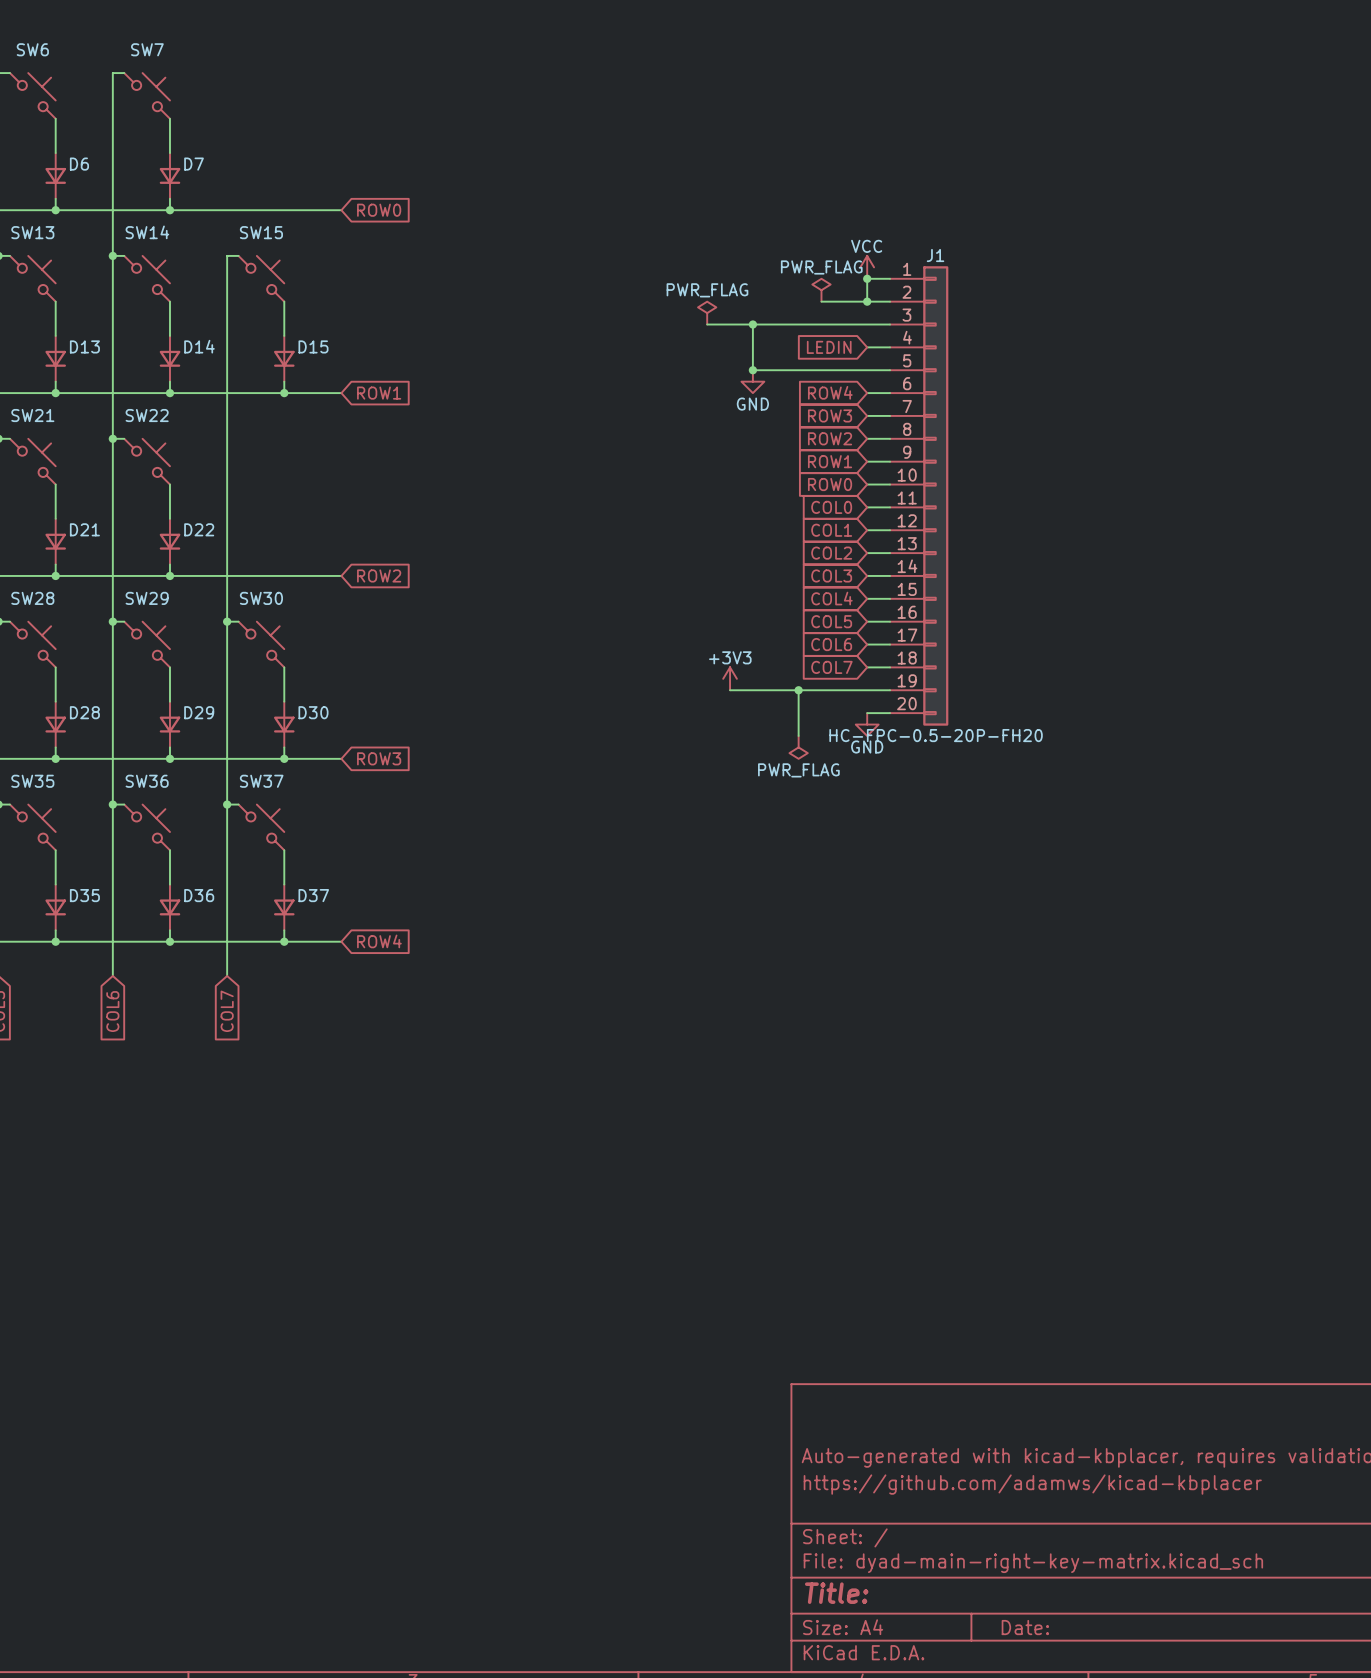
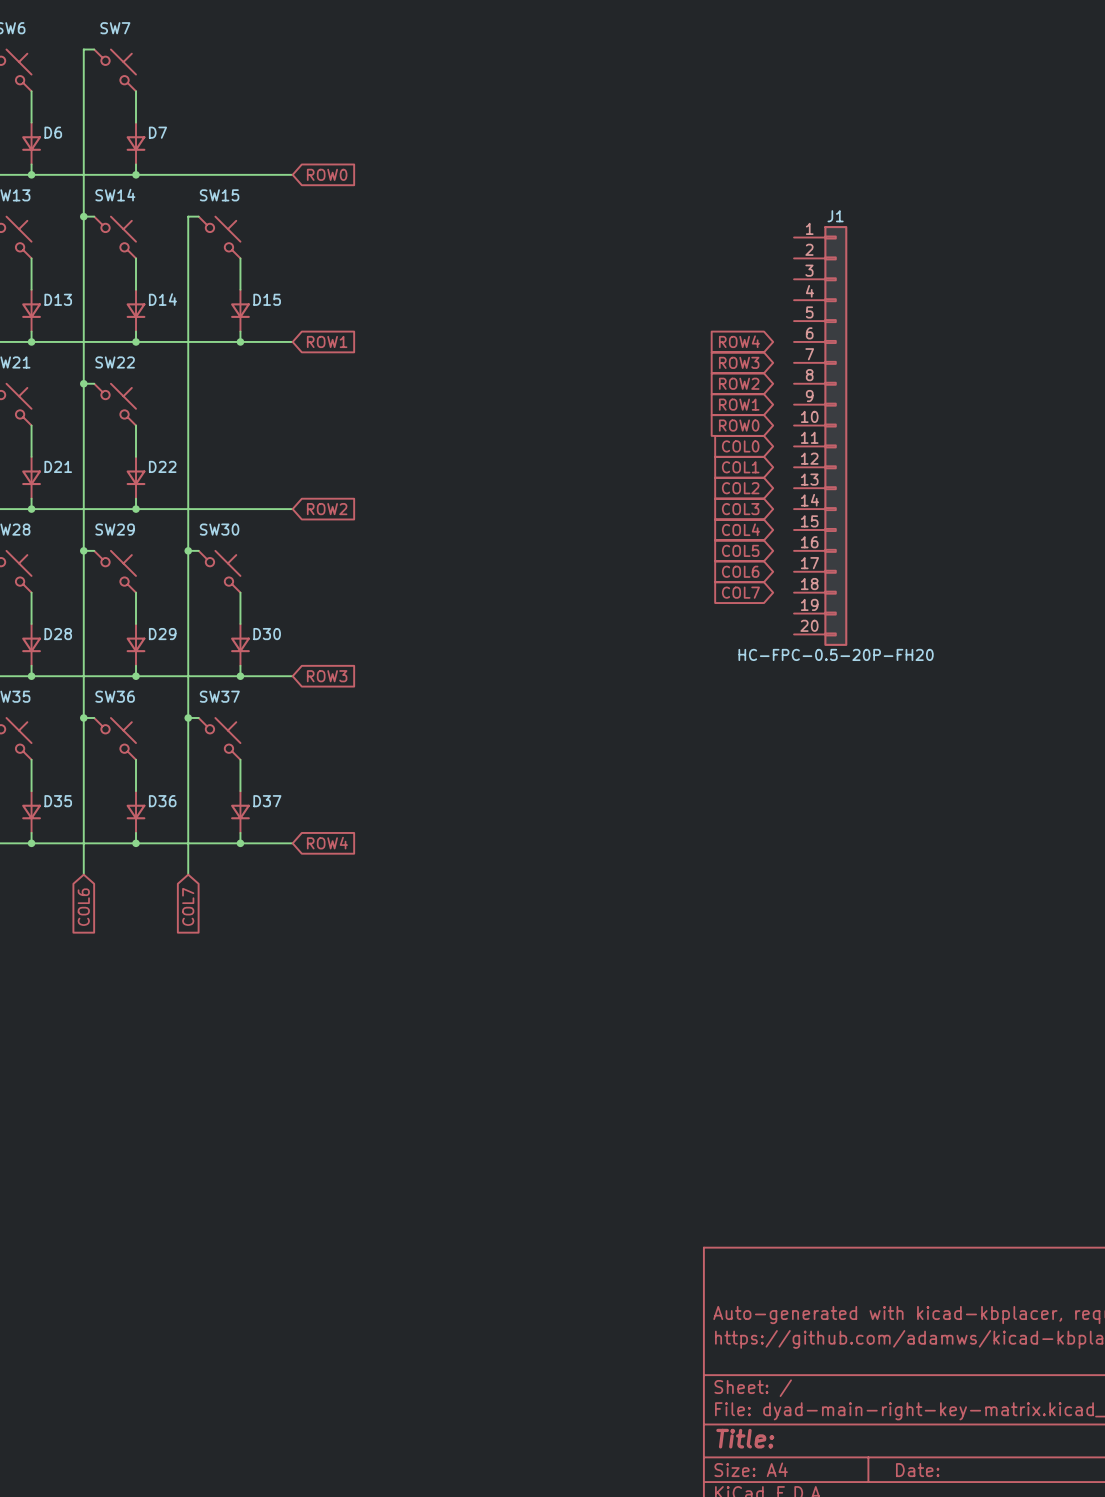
power symbol: VCC (867, 267) -> none
junction: (867, 278) -> none
wire: (890, 278) (867, 278) (867, 301) -> none
power symbol: PWR_FLAG (821, 290) -> none
wire: (821, 301) (890, 301) -> none
junction: (867, 301) -> none
power symbol: PWR_FLAG (707, 313) -> none
wire: (707, 324) (890, 324) -> none
wire: (752, 324) (752, 370) (890, 370) -> none
junction: (752, 324) -> none
global label: LEDIN (829, 347) -> none
wire: (867, 347) (890, 347) -> none
junction: (752, 370) -> none
power symbol: GND (752, 381) -> none
wire: (867, 393) (890, 393) -> none
wire: (867, 415) (890, 415) -> none
wire: (867, 438) (890, 438) -> none
wire: (867, 461) (890, 461) -> none
wire: (867, 484) (890, 484) -> none
wire: (867, 507) (890, 507) -> none
wire: (867, 530) (890, 530) -> none
wire: (867, 553) (890, 553) -> none
wire: (867, 575) (890, 575) -> none
wire: (867, 598) (890, 598) -> none
wire: (867, 621) (890, 621) -> none
wire: (867, 644) (890, 644) -> none
wire: (867, 667) (890, 667) -> none
power symbol: +3V3 (730, 678) -> none
wire: (730, 690) (890, 690) -> none
wire: (798, 690) (798, 735) -> none
junction: (798, 690) -> none
wire: (867, 713) (890, 713) -> none
power symbol: GND (867, 724) -> none
power symbol: PWR_FLAG (798, 747) -> none

